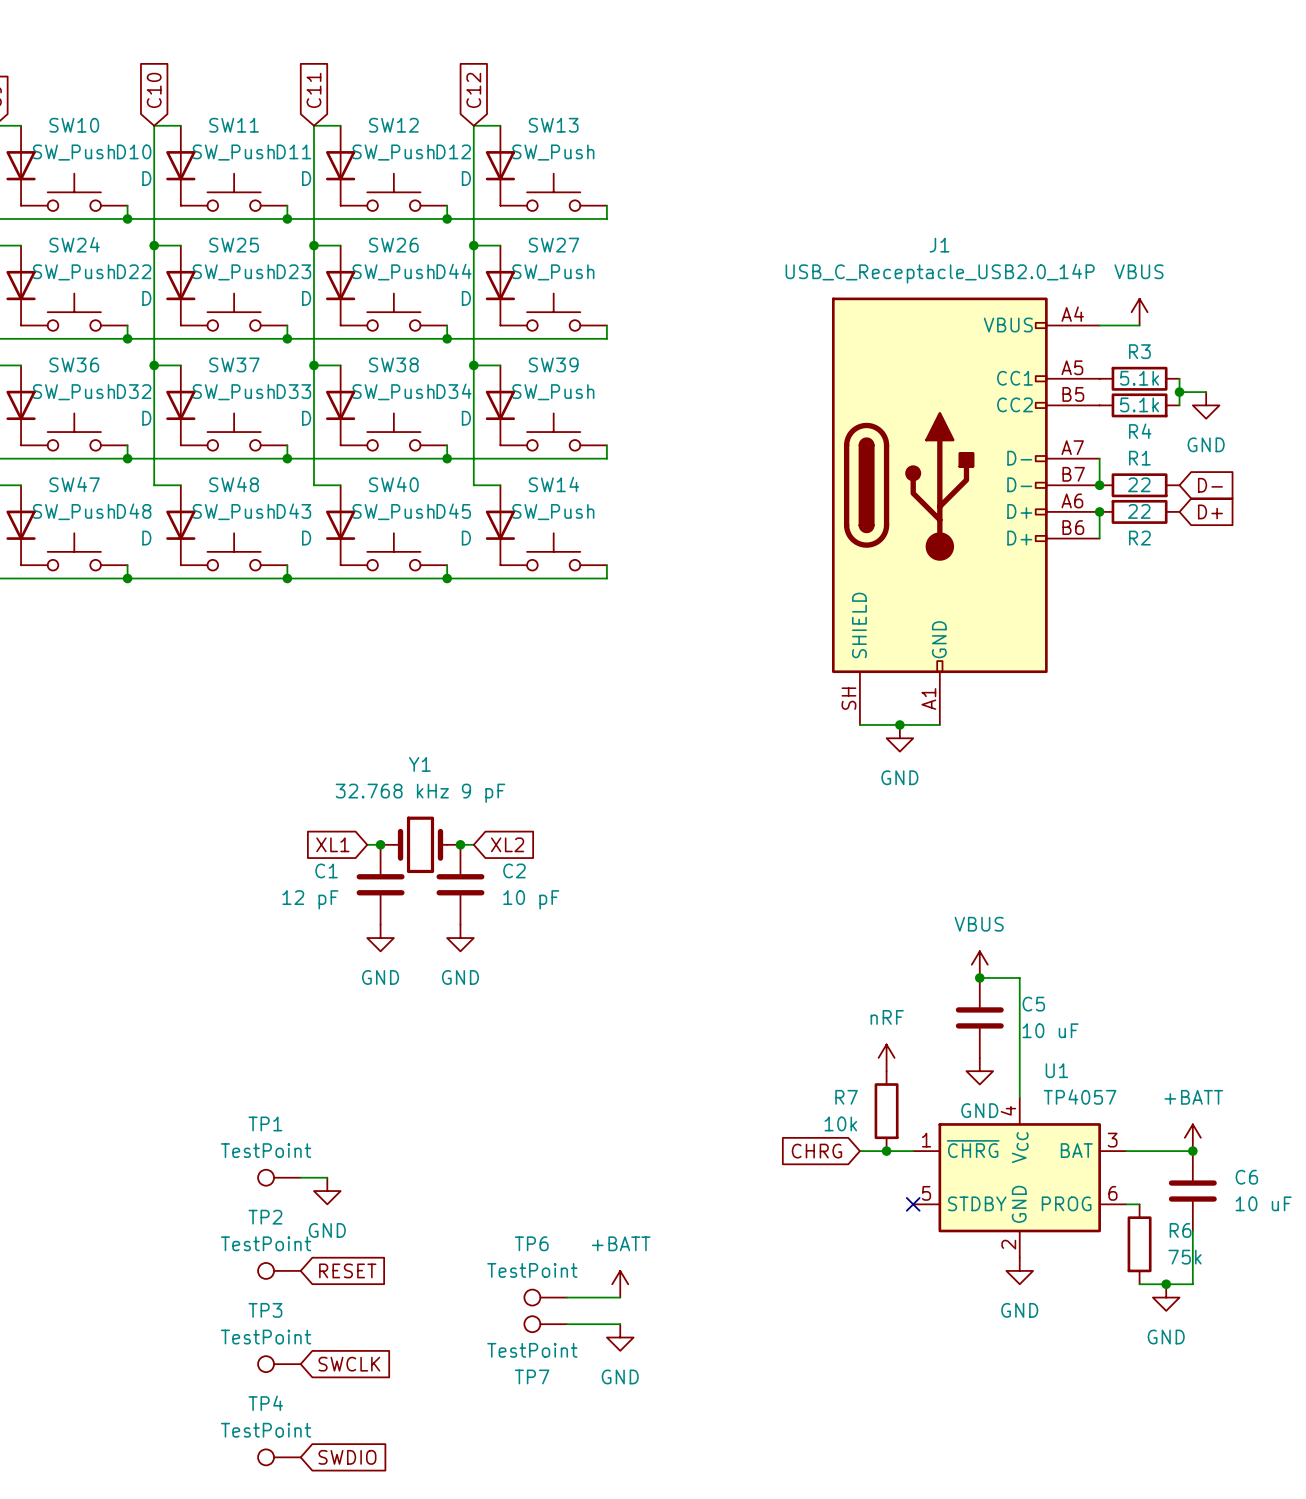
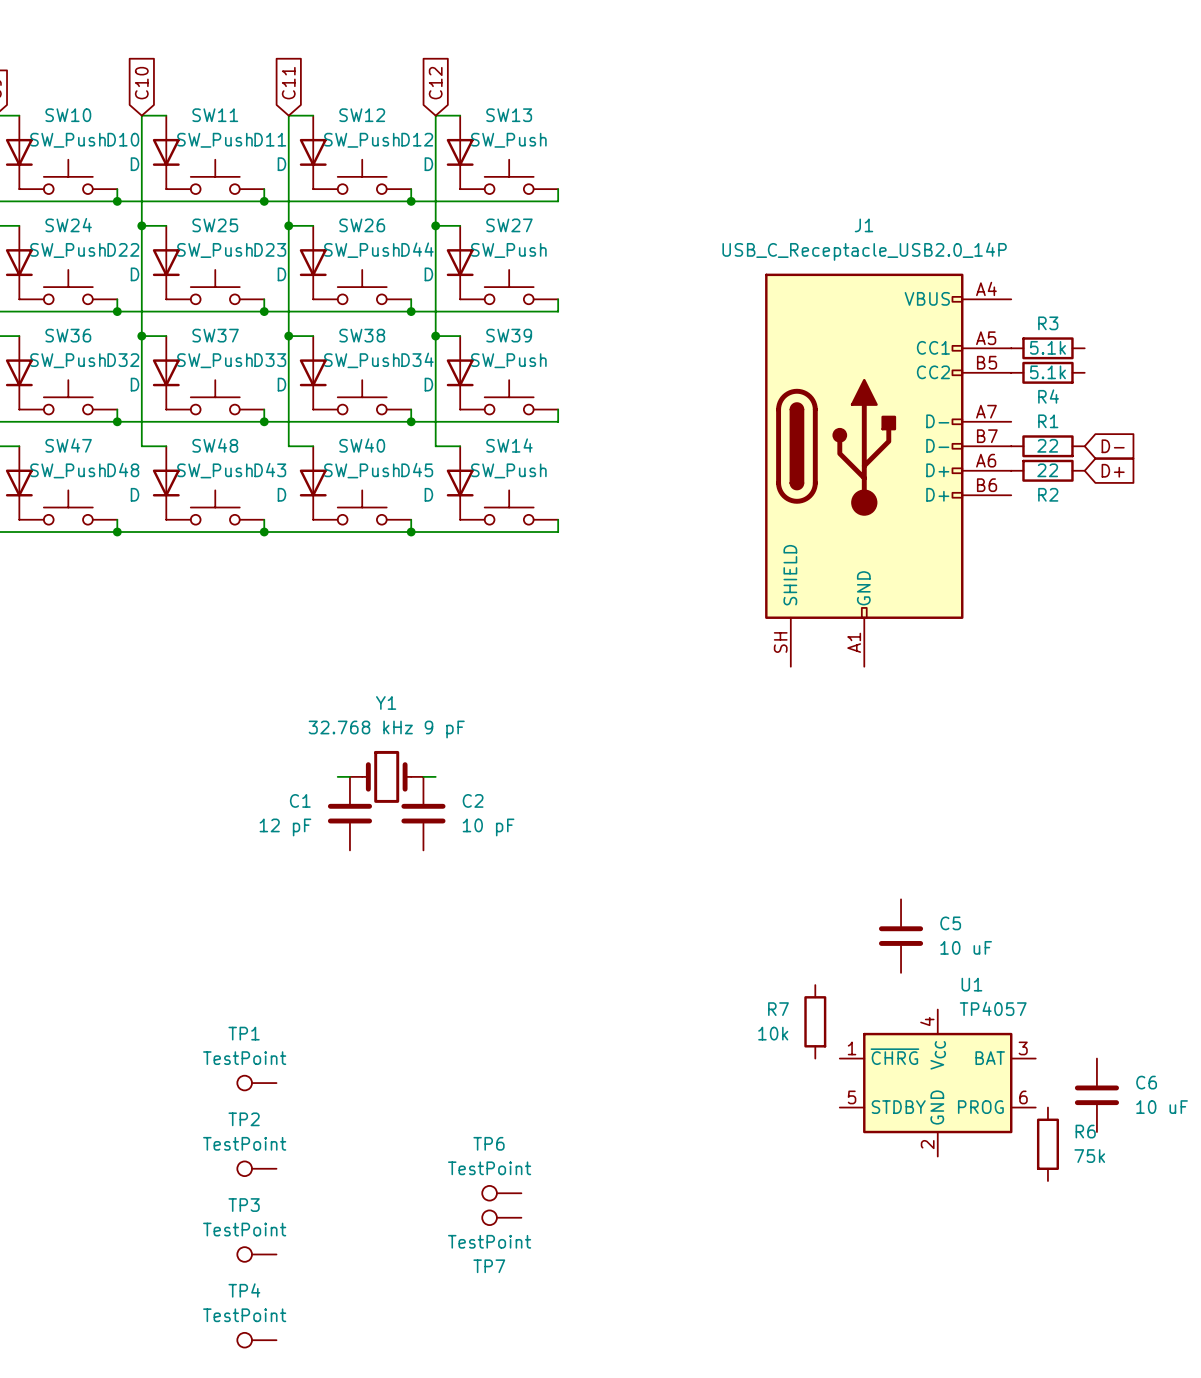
power symbol: VBUS (1139, 312) -> none
wire: (1099, 325) (1139, 325) -> none
wire: (1179, 378) (1179, 405) -> none
wire: (1179, 392) (1206, 392) -> none
junction: (1179, 392) -> none
power symbol: GND (1206, 405) -> none
wire: (1099, 458) (1099, 485) -> none
junction: (1099, 485) -> none
wire: (1099, 511) (1099, 538) -> none
junction: (1099, 511) -> none
wire: (859, 724) (939, 724) -> none
junction: (899, 724) -> none
power symbol: GND (899, 738) -> none
global label: XL1 (332, 844) -> none
junction: (380, 844) -> none
junction: (460, 844) -> none
global label: XL2 (507, 844) -> none
power symbol: GND (380, 938) -> none
power symbol: GND (460, 938) -> none
power symbol: VBUS (979, 964) -> none
wire: (979, 977) (1019, 977) (1019, 1097) -> none
junction: (979, 977) -> none
power symbol: nRF (886, 1057) -> none
power symbol: GND (979, 1071) -> none
power symbol: +BATT (1192, 1137) -> none
global label: CHRG (816, 1151) -> none
wire: (859, 1151) (913, 1151) -> none
junction: (886, 1151) -> none
wire: (1126, 1151) (1192, 1151) -> none
junction: (1192, 1151) -> none
wire: (300, 1177) (327, 1177) -> none
power symbol: GND (327, 1191) -> none
no-connect mark: (913, 1204) -> none
wire: (1126, 1204) (1139, 1204) -> none
wire: (1192, 1230) (1192, 1284) (1139, 1284) -> none
global label: RESET (347, 1270) -> none
power symbol: GND (1019, 1270) -> none
power symbol: +BATT (620, 1284) -> none
junction: (1166, 1284) -> none
wire: (566, 1297) (620, 1297) -> none
power symbol: GND (1166, 1297) -> none
wire: (566, 1324) (620, 1324) -> none
power symbol: GND (620, 1337) -> none
global label: SWCLK (349, 1364) -> none
global label: SWDIO (347, 1457) -> none

